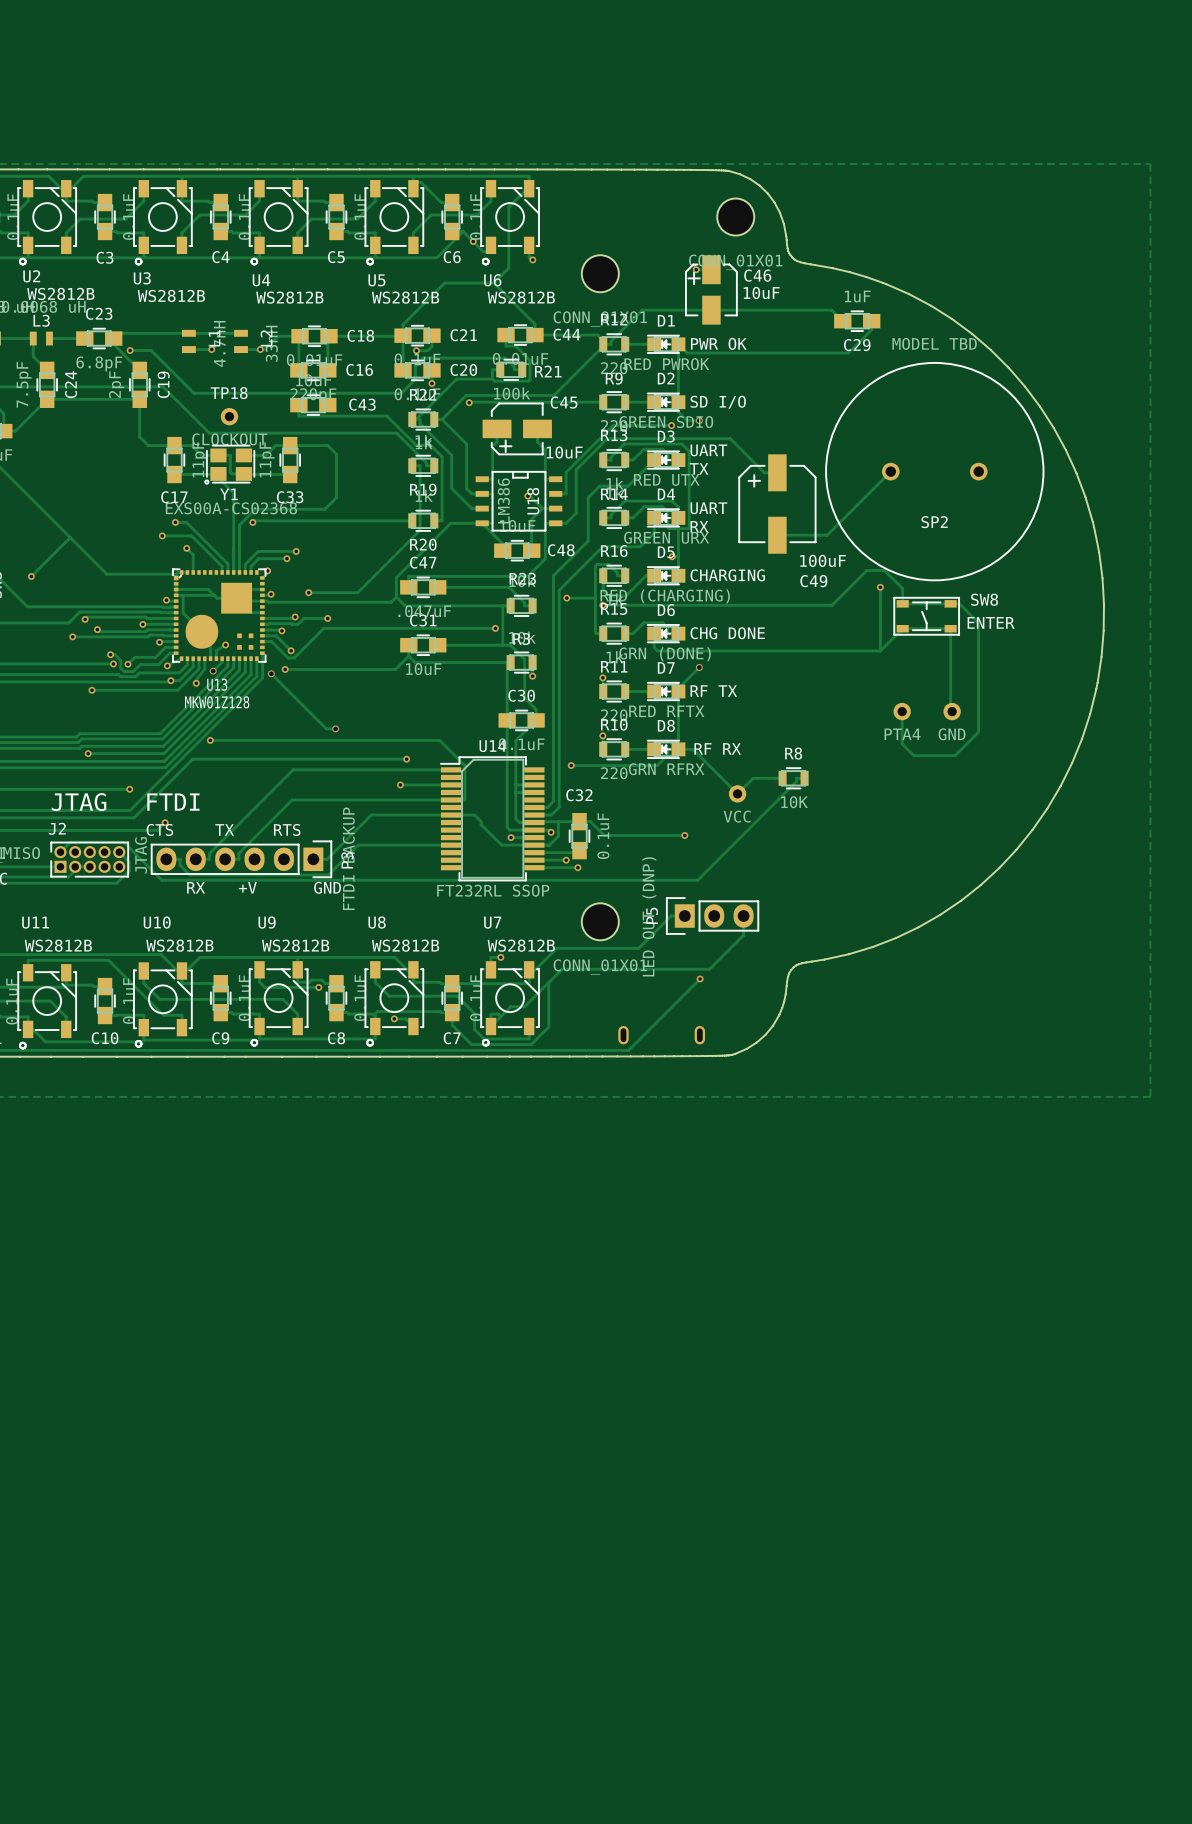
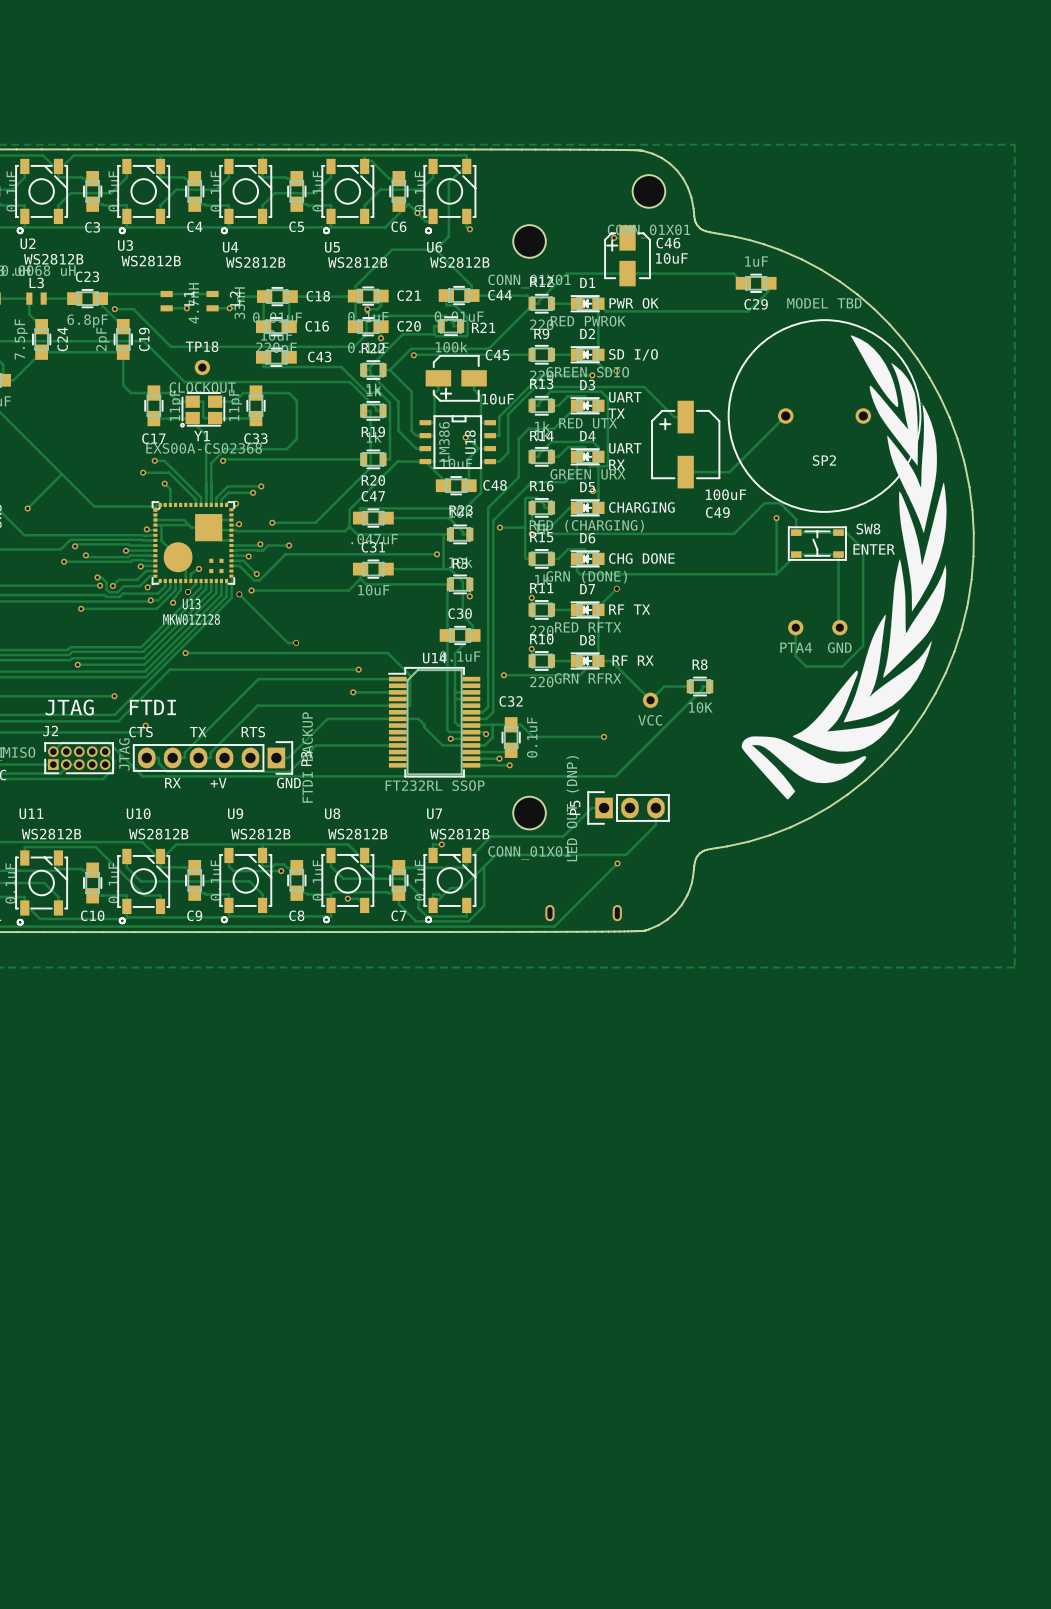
drawing: none -> [741, 335, 947, 800]

